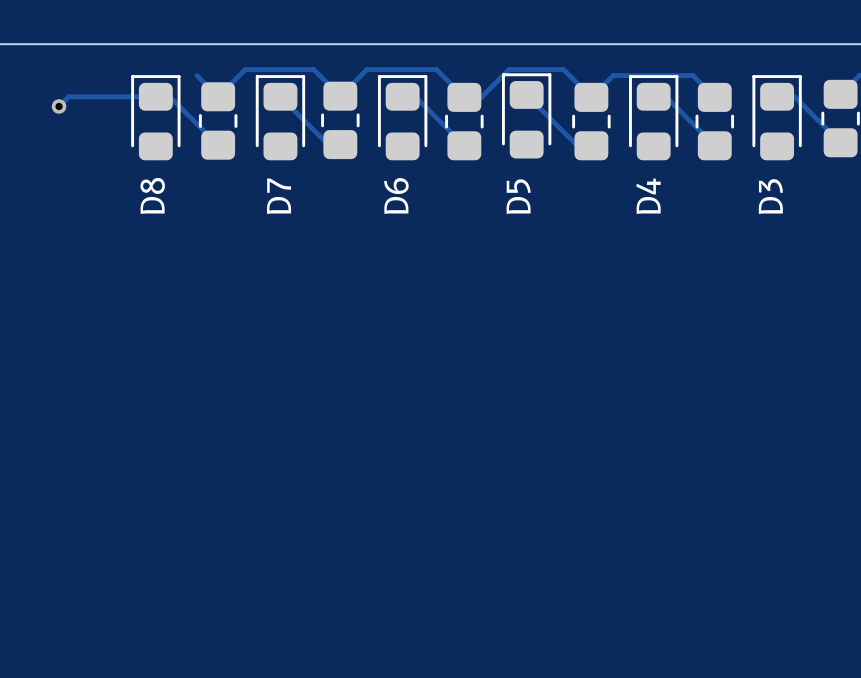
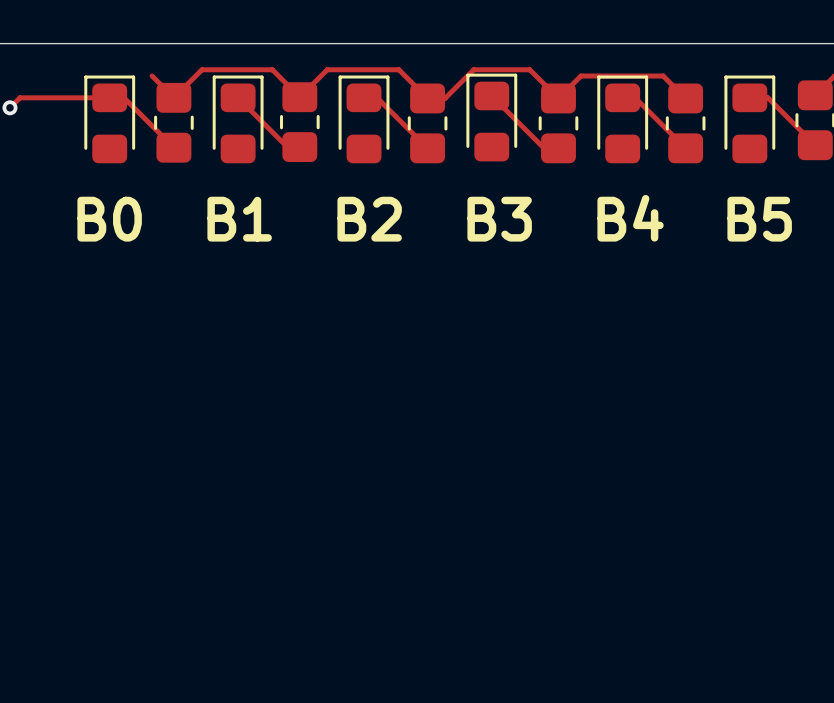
D8 name: D8 (152, 195) -> none
D7 name: D7 (279, 196) -> none
D6 name: D6 (396, 196) -> none
D5 name: D5 (518, 196) -> none
D4 name: D4 (648, 196) -> none
D3 name: D3 (770, 196) -> none
text: none -> B0 (109, 219)
text: none -> B1 (239, 219)
text: none -> B2 (369, 219)
text: none -> B3 (499, 219)
text: none -> B4 (630, 218)
text: none -> B5 (759, 219)

